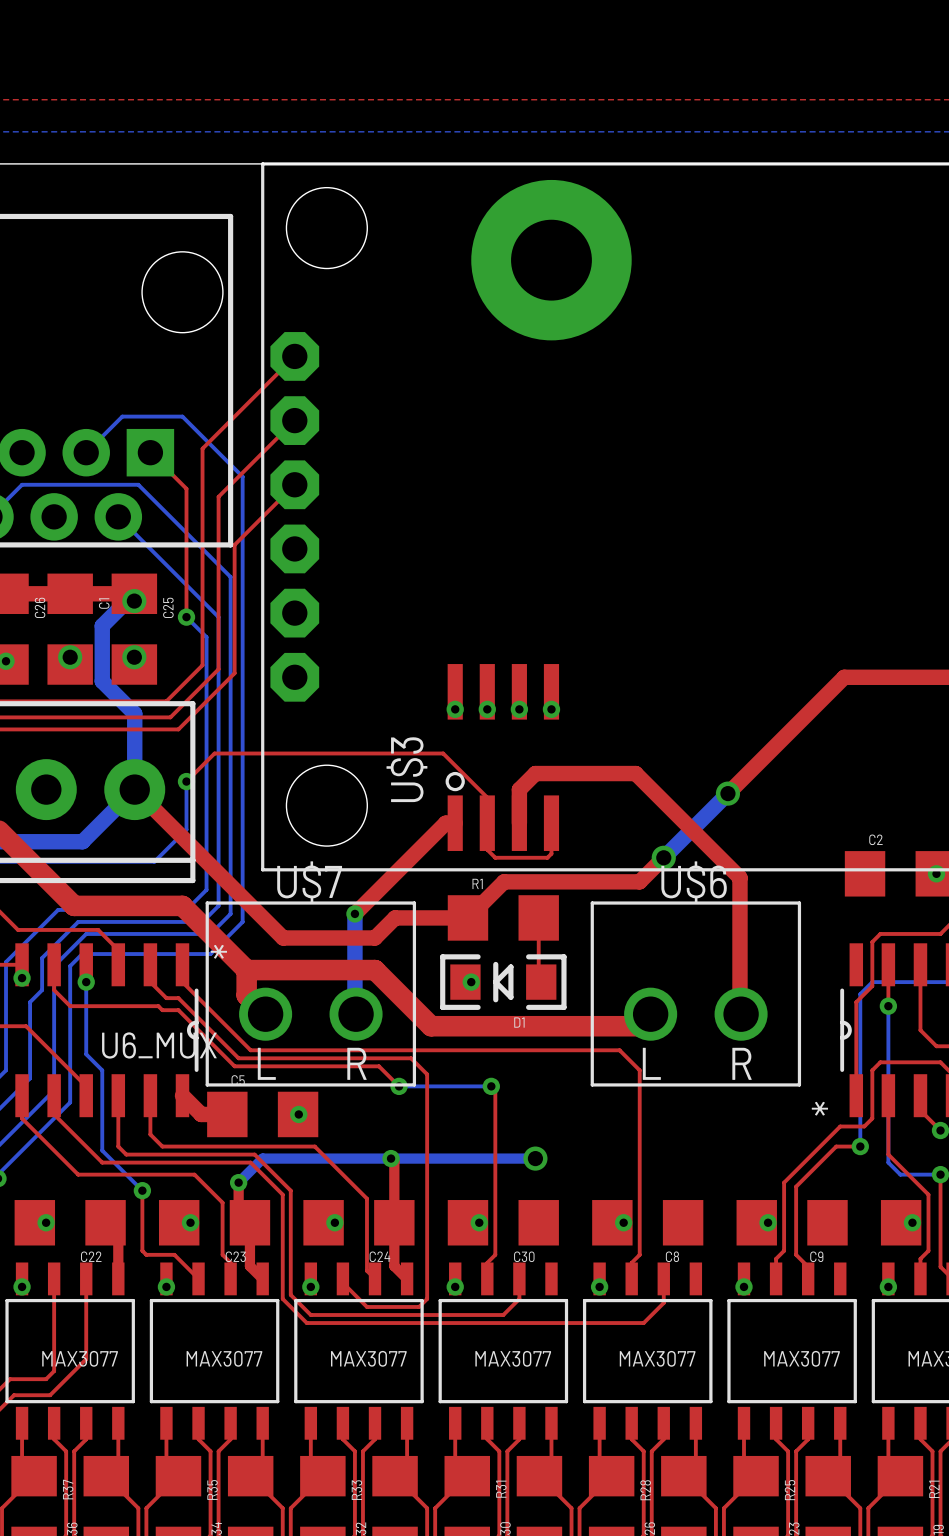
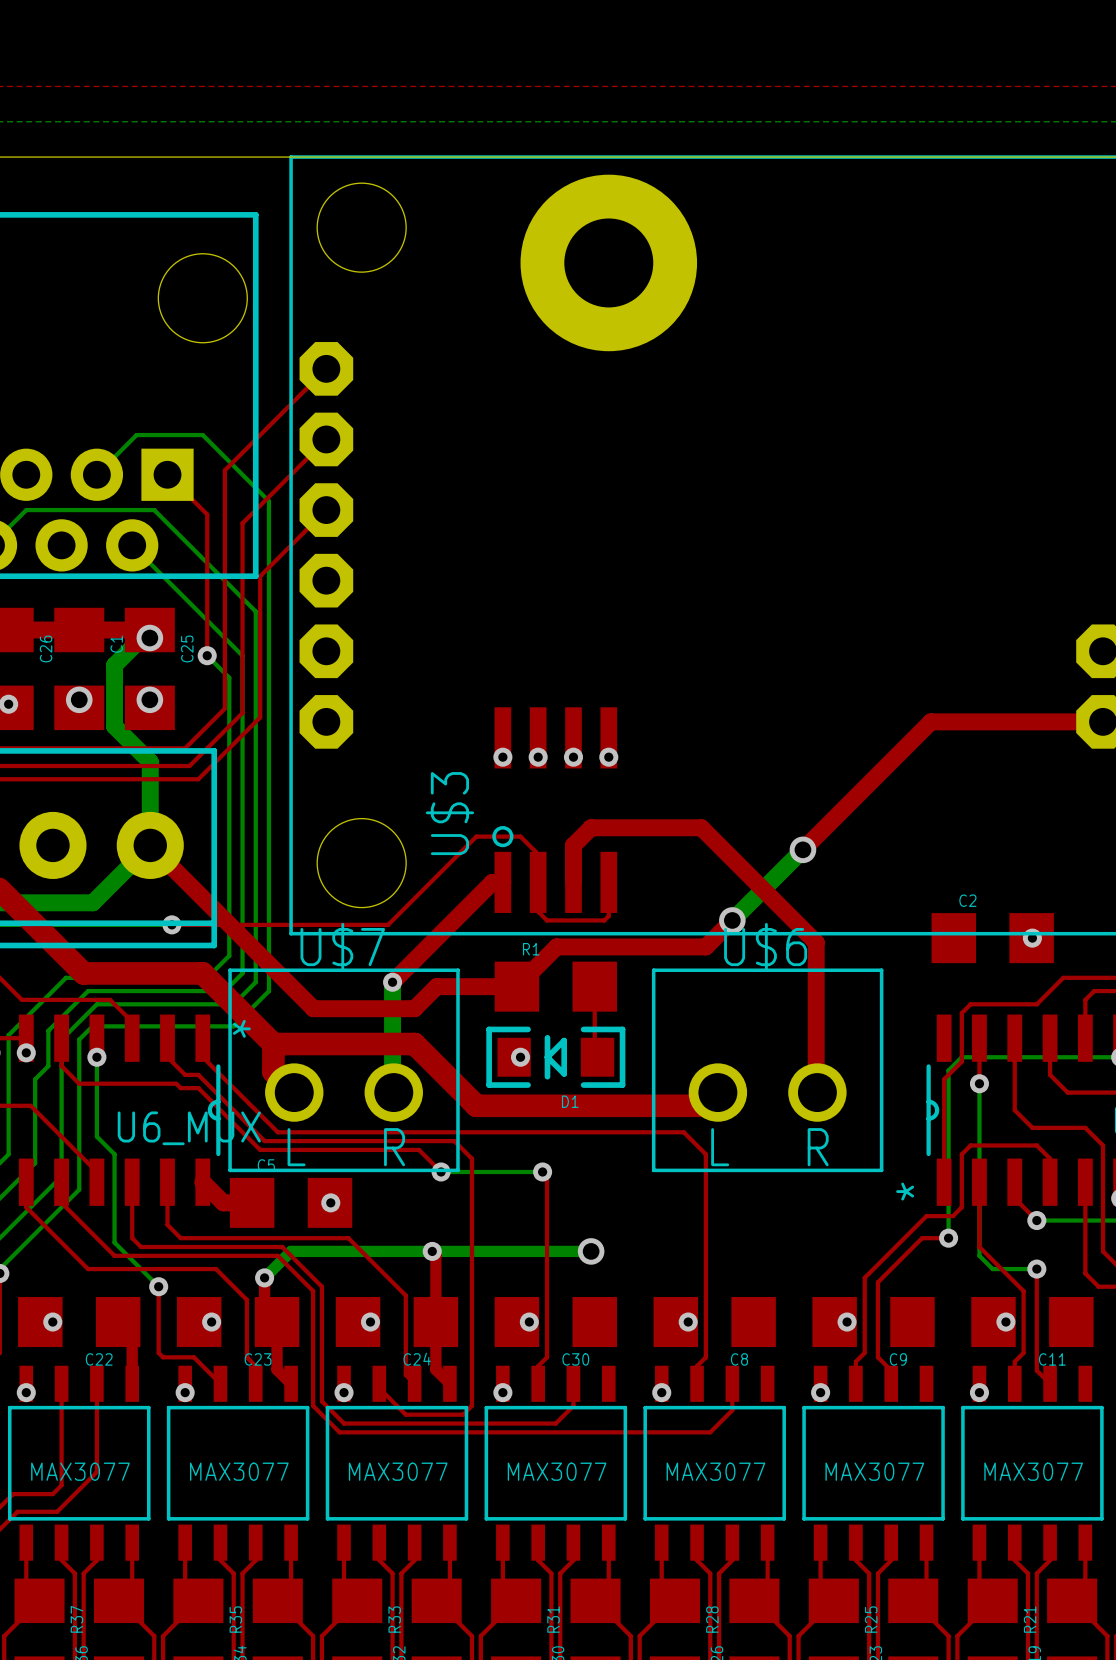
top track: (186, 781) (214, 753) (443, 753) (471, 781) -> (171, 924) (388, 924) (476, 836) (520, 836)
bottom track: (186, 781) (186, 829) (154, 861) -> none
via position: (186, 781) -> (171, 924)

